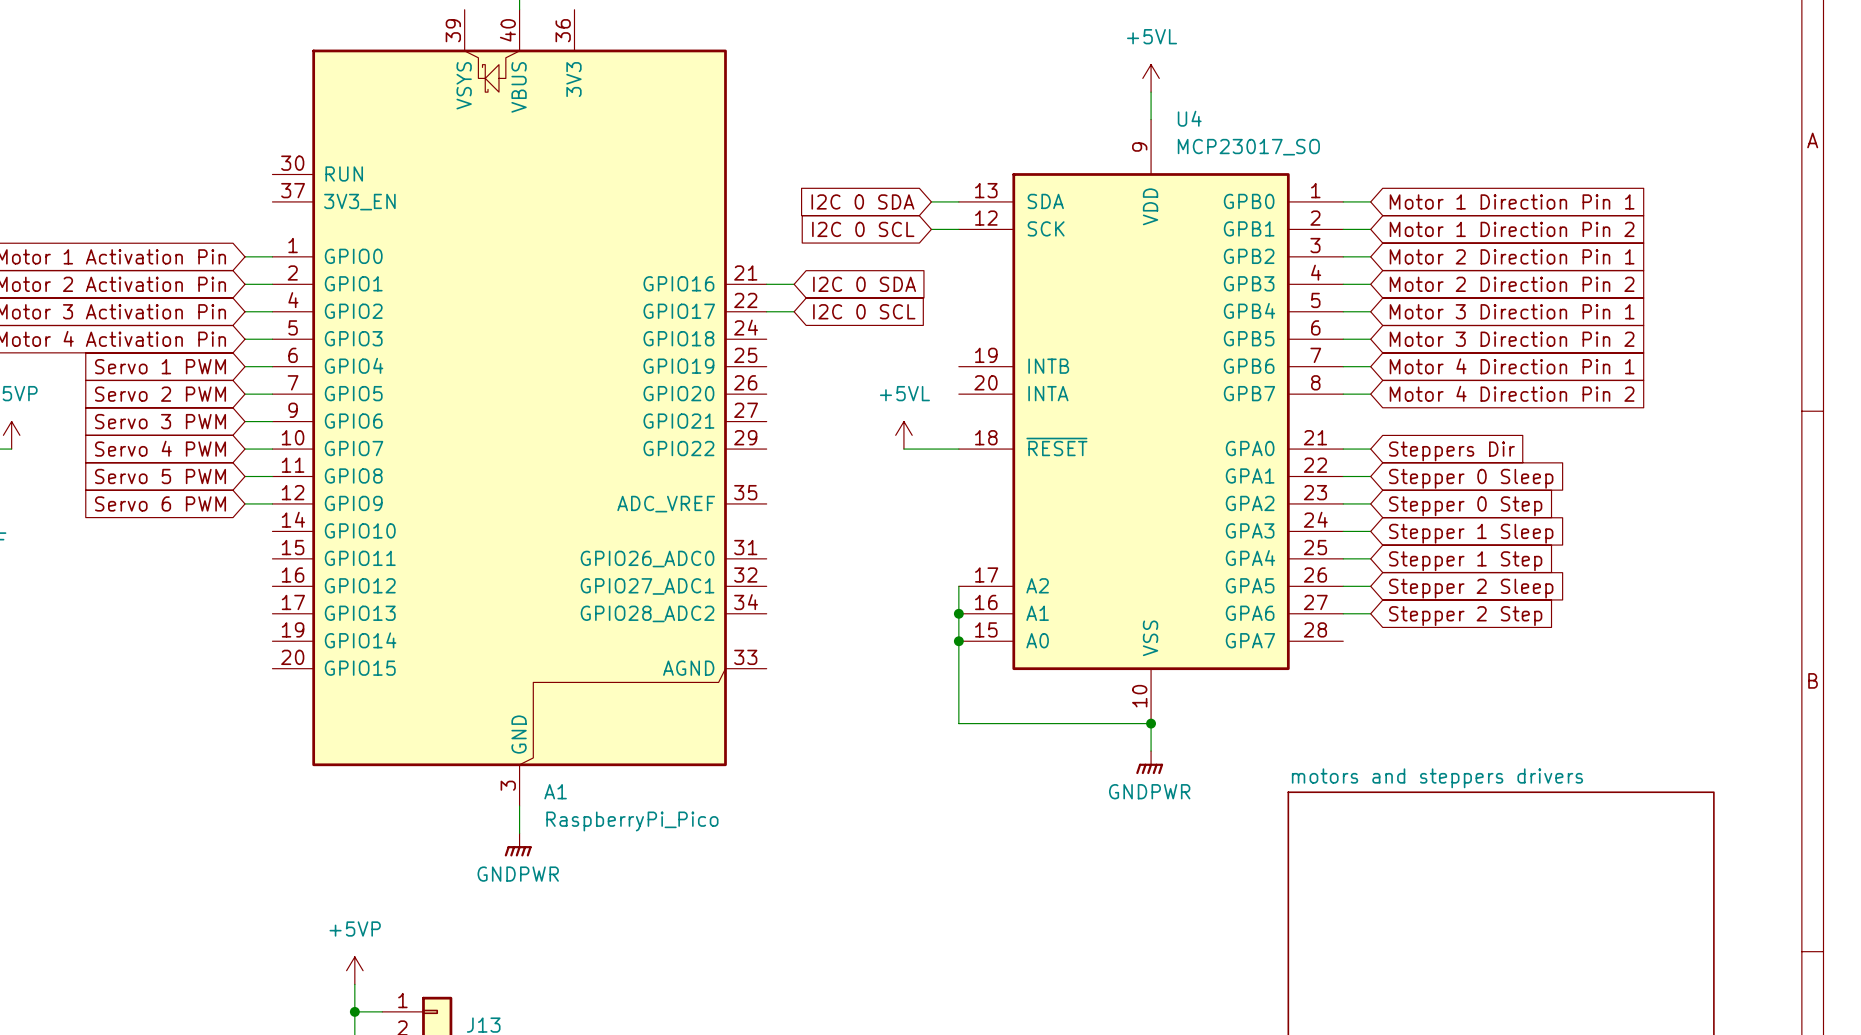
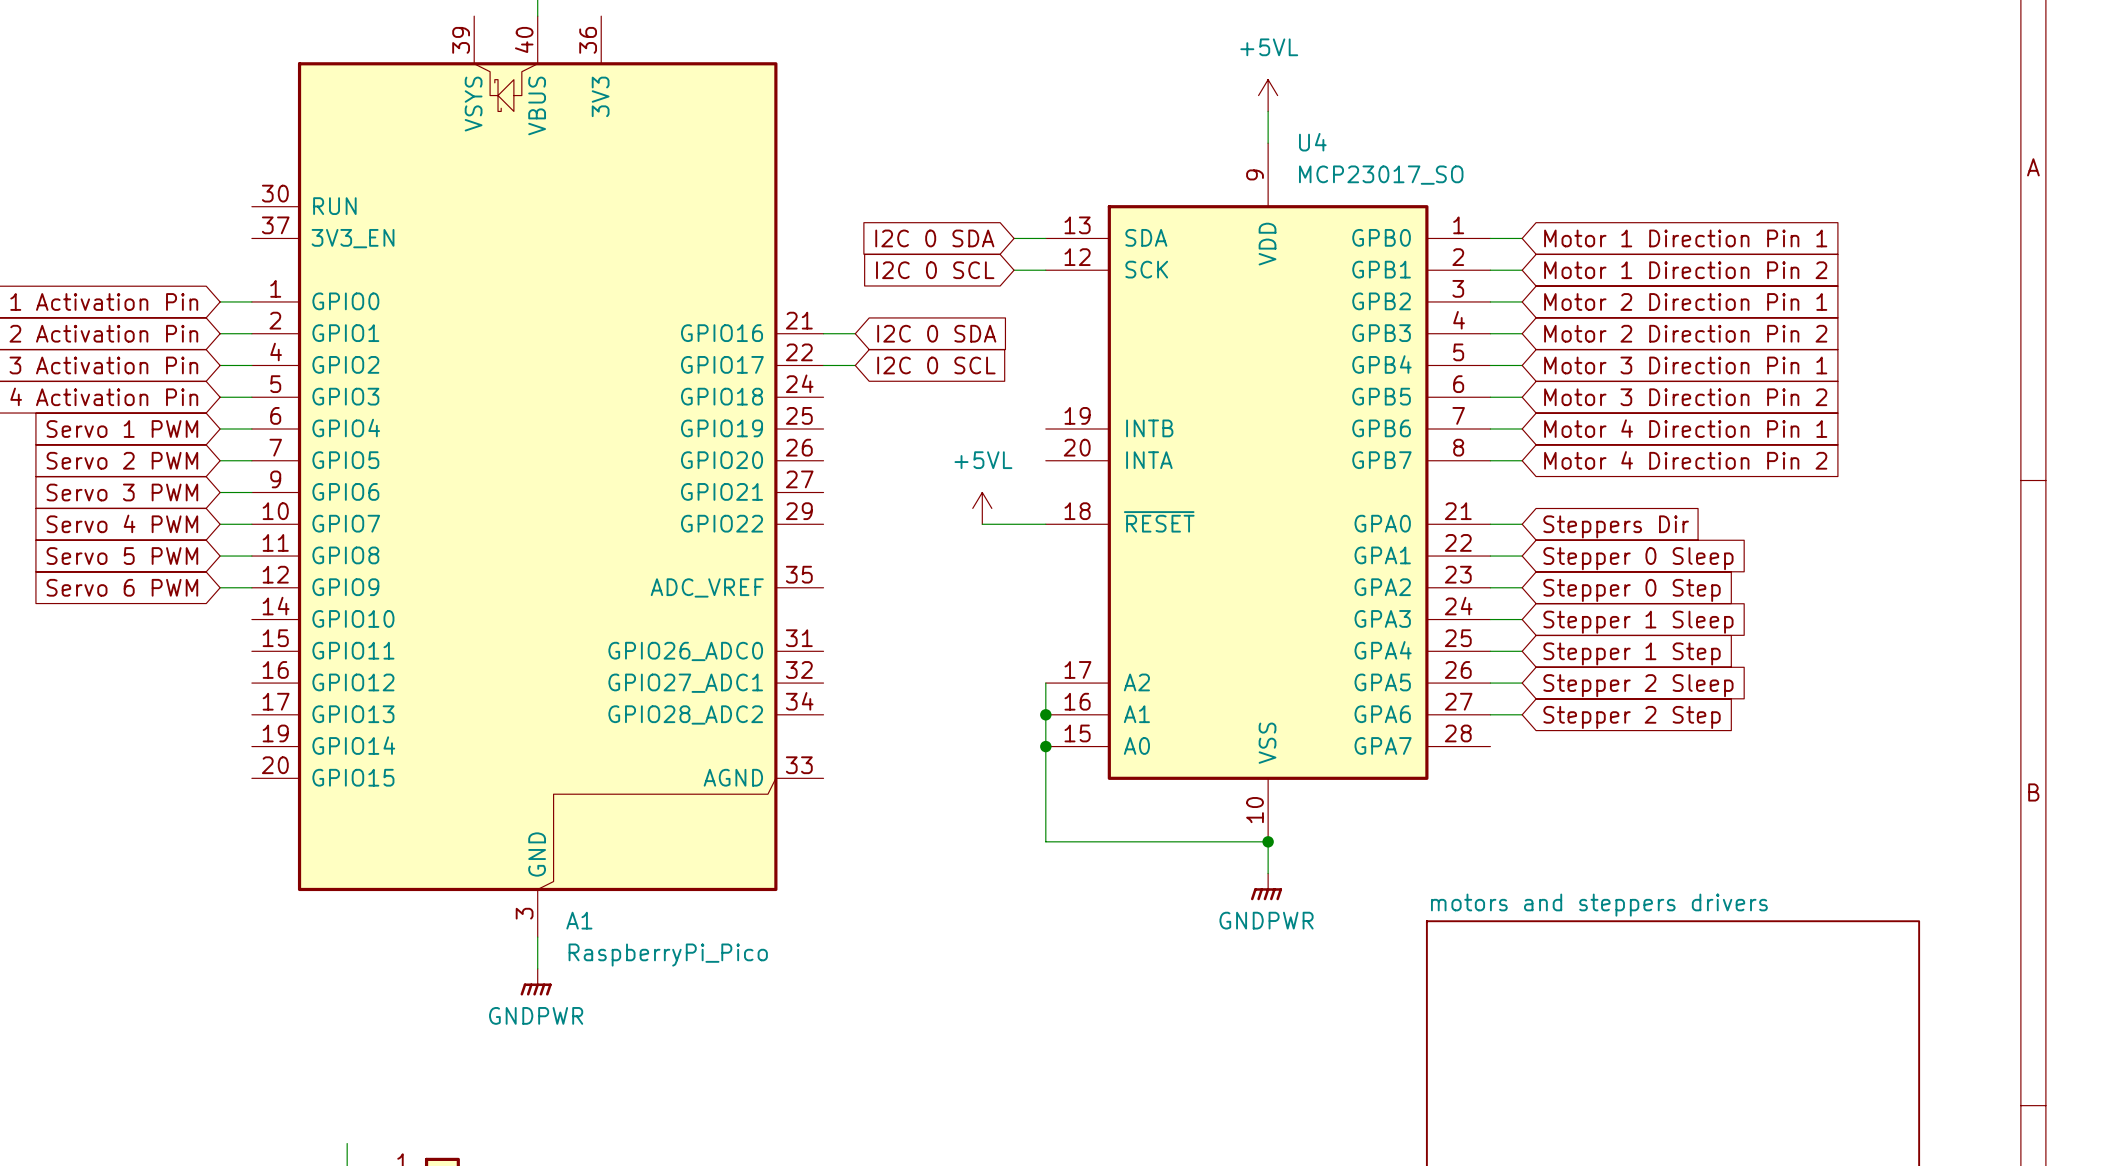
power symbol: +5VP (354, 970) -> none

